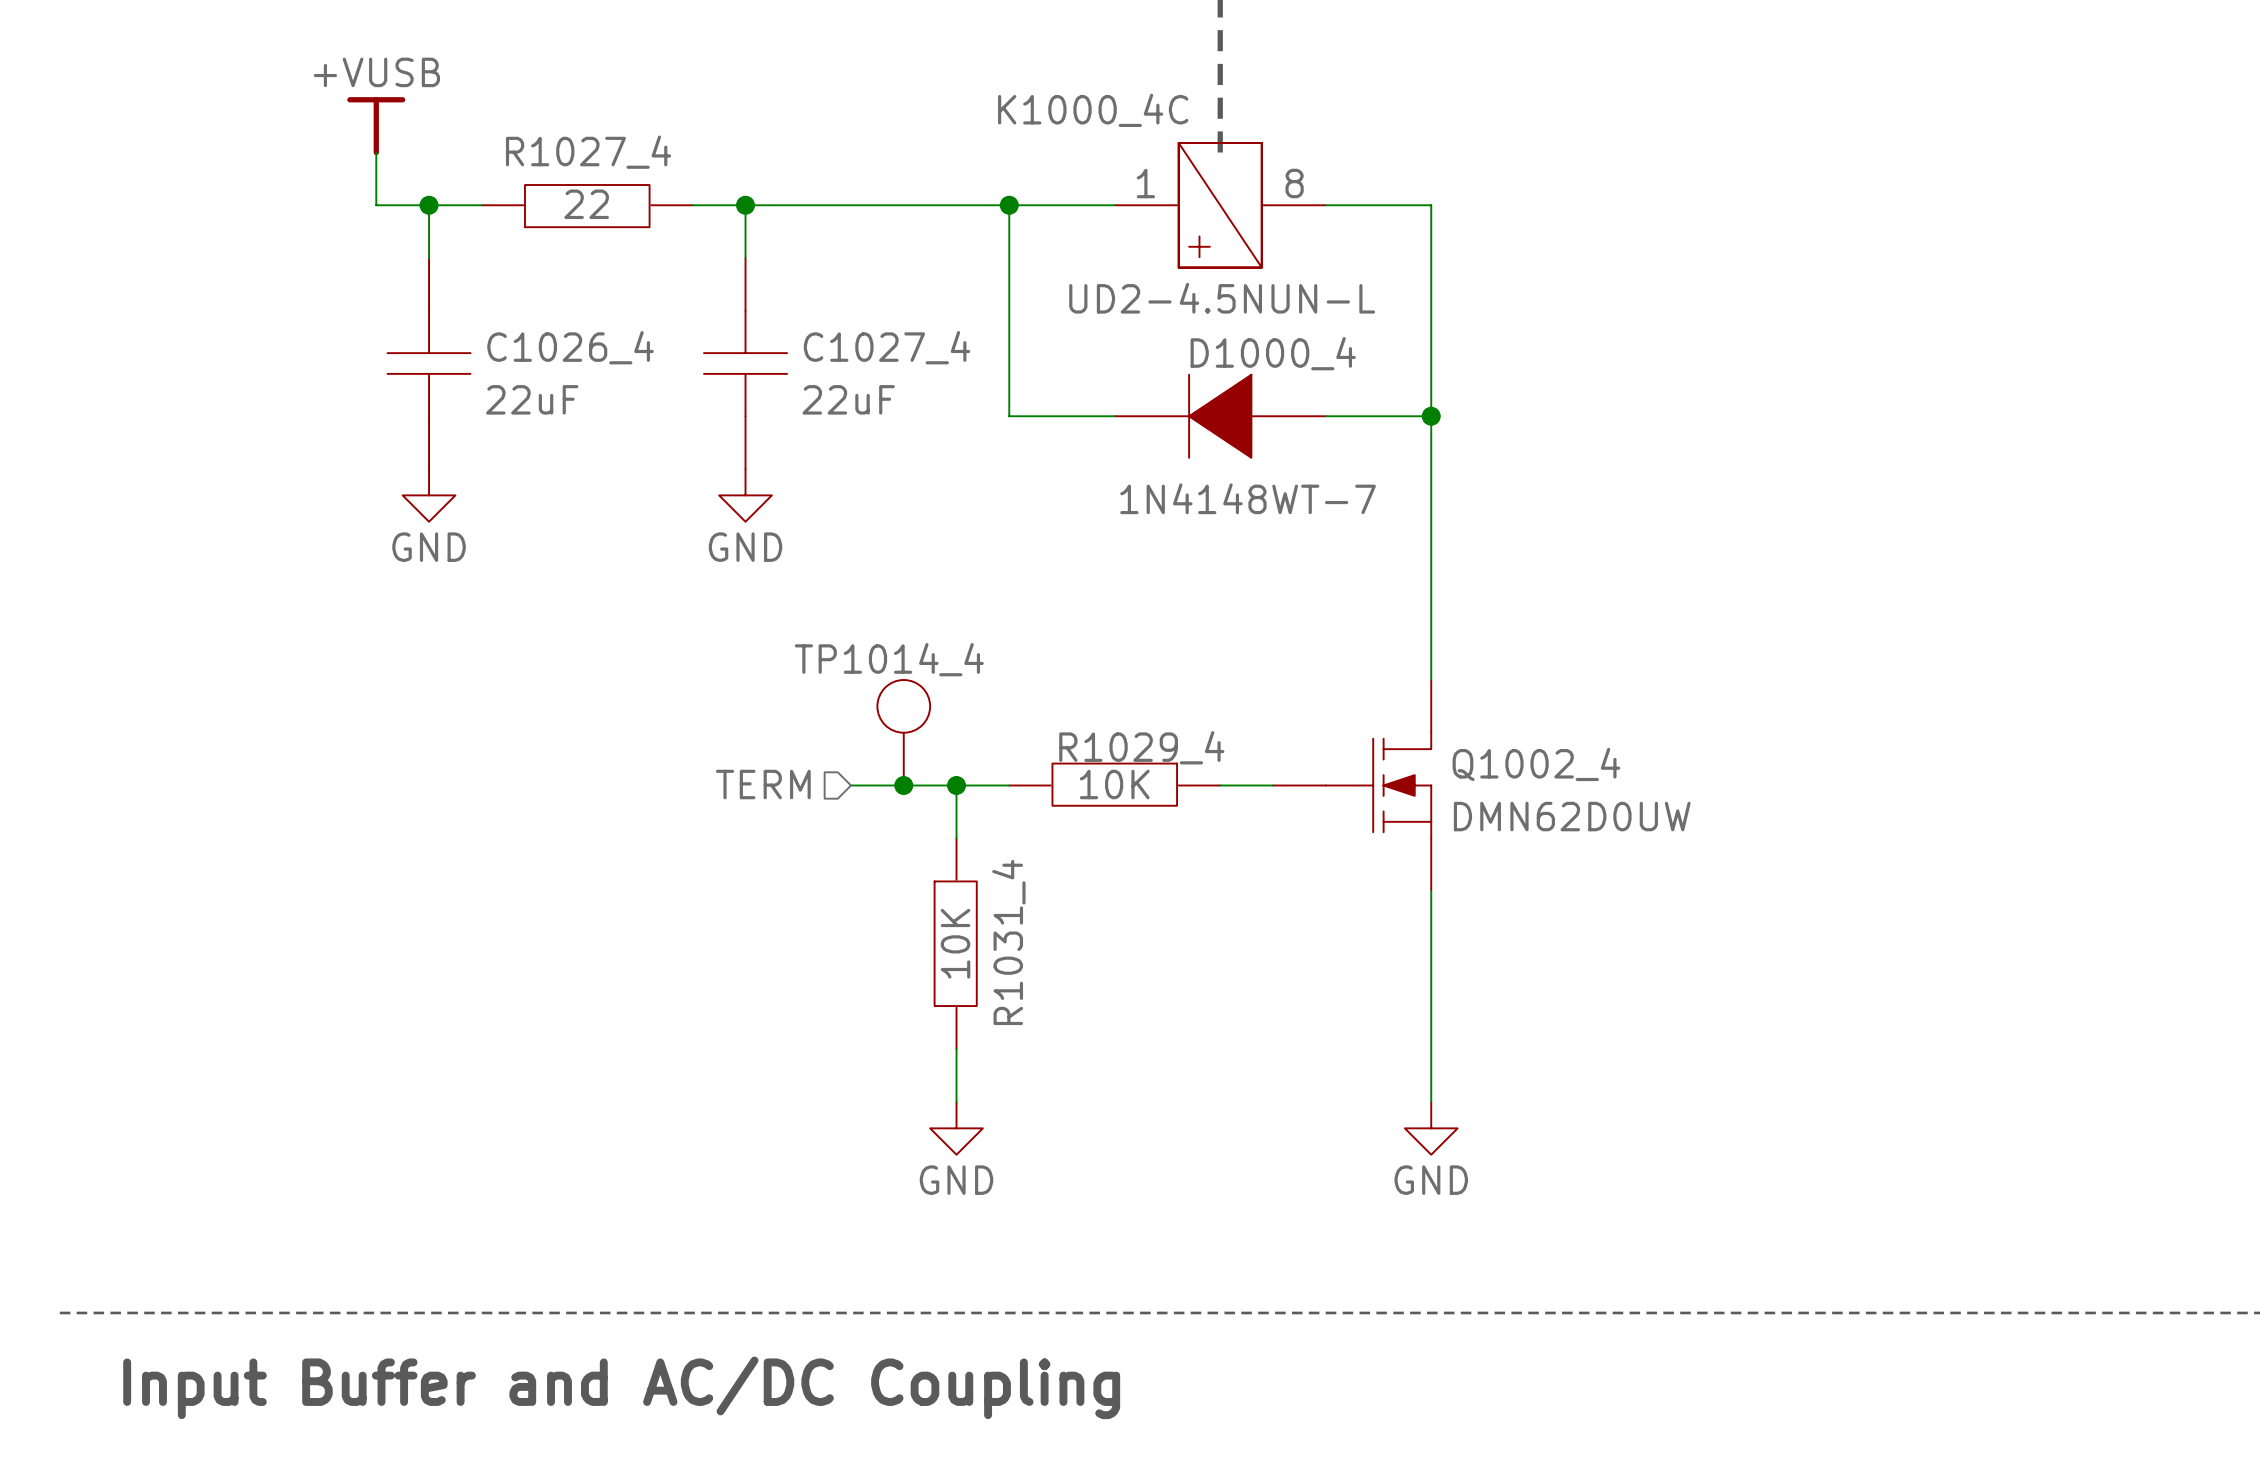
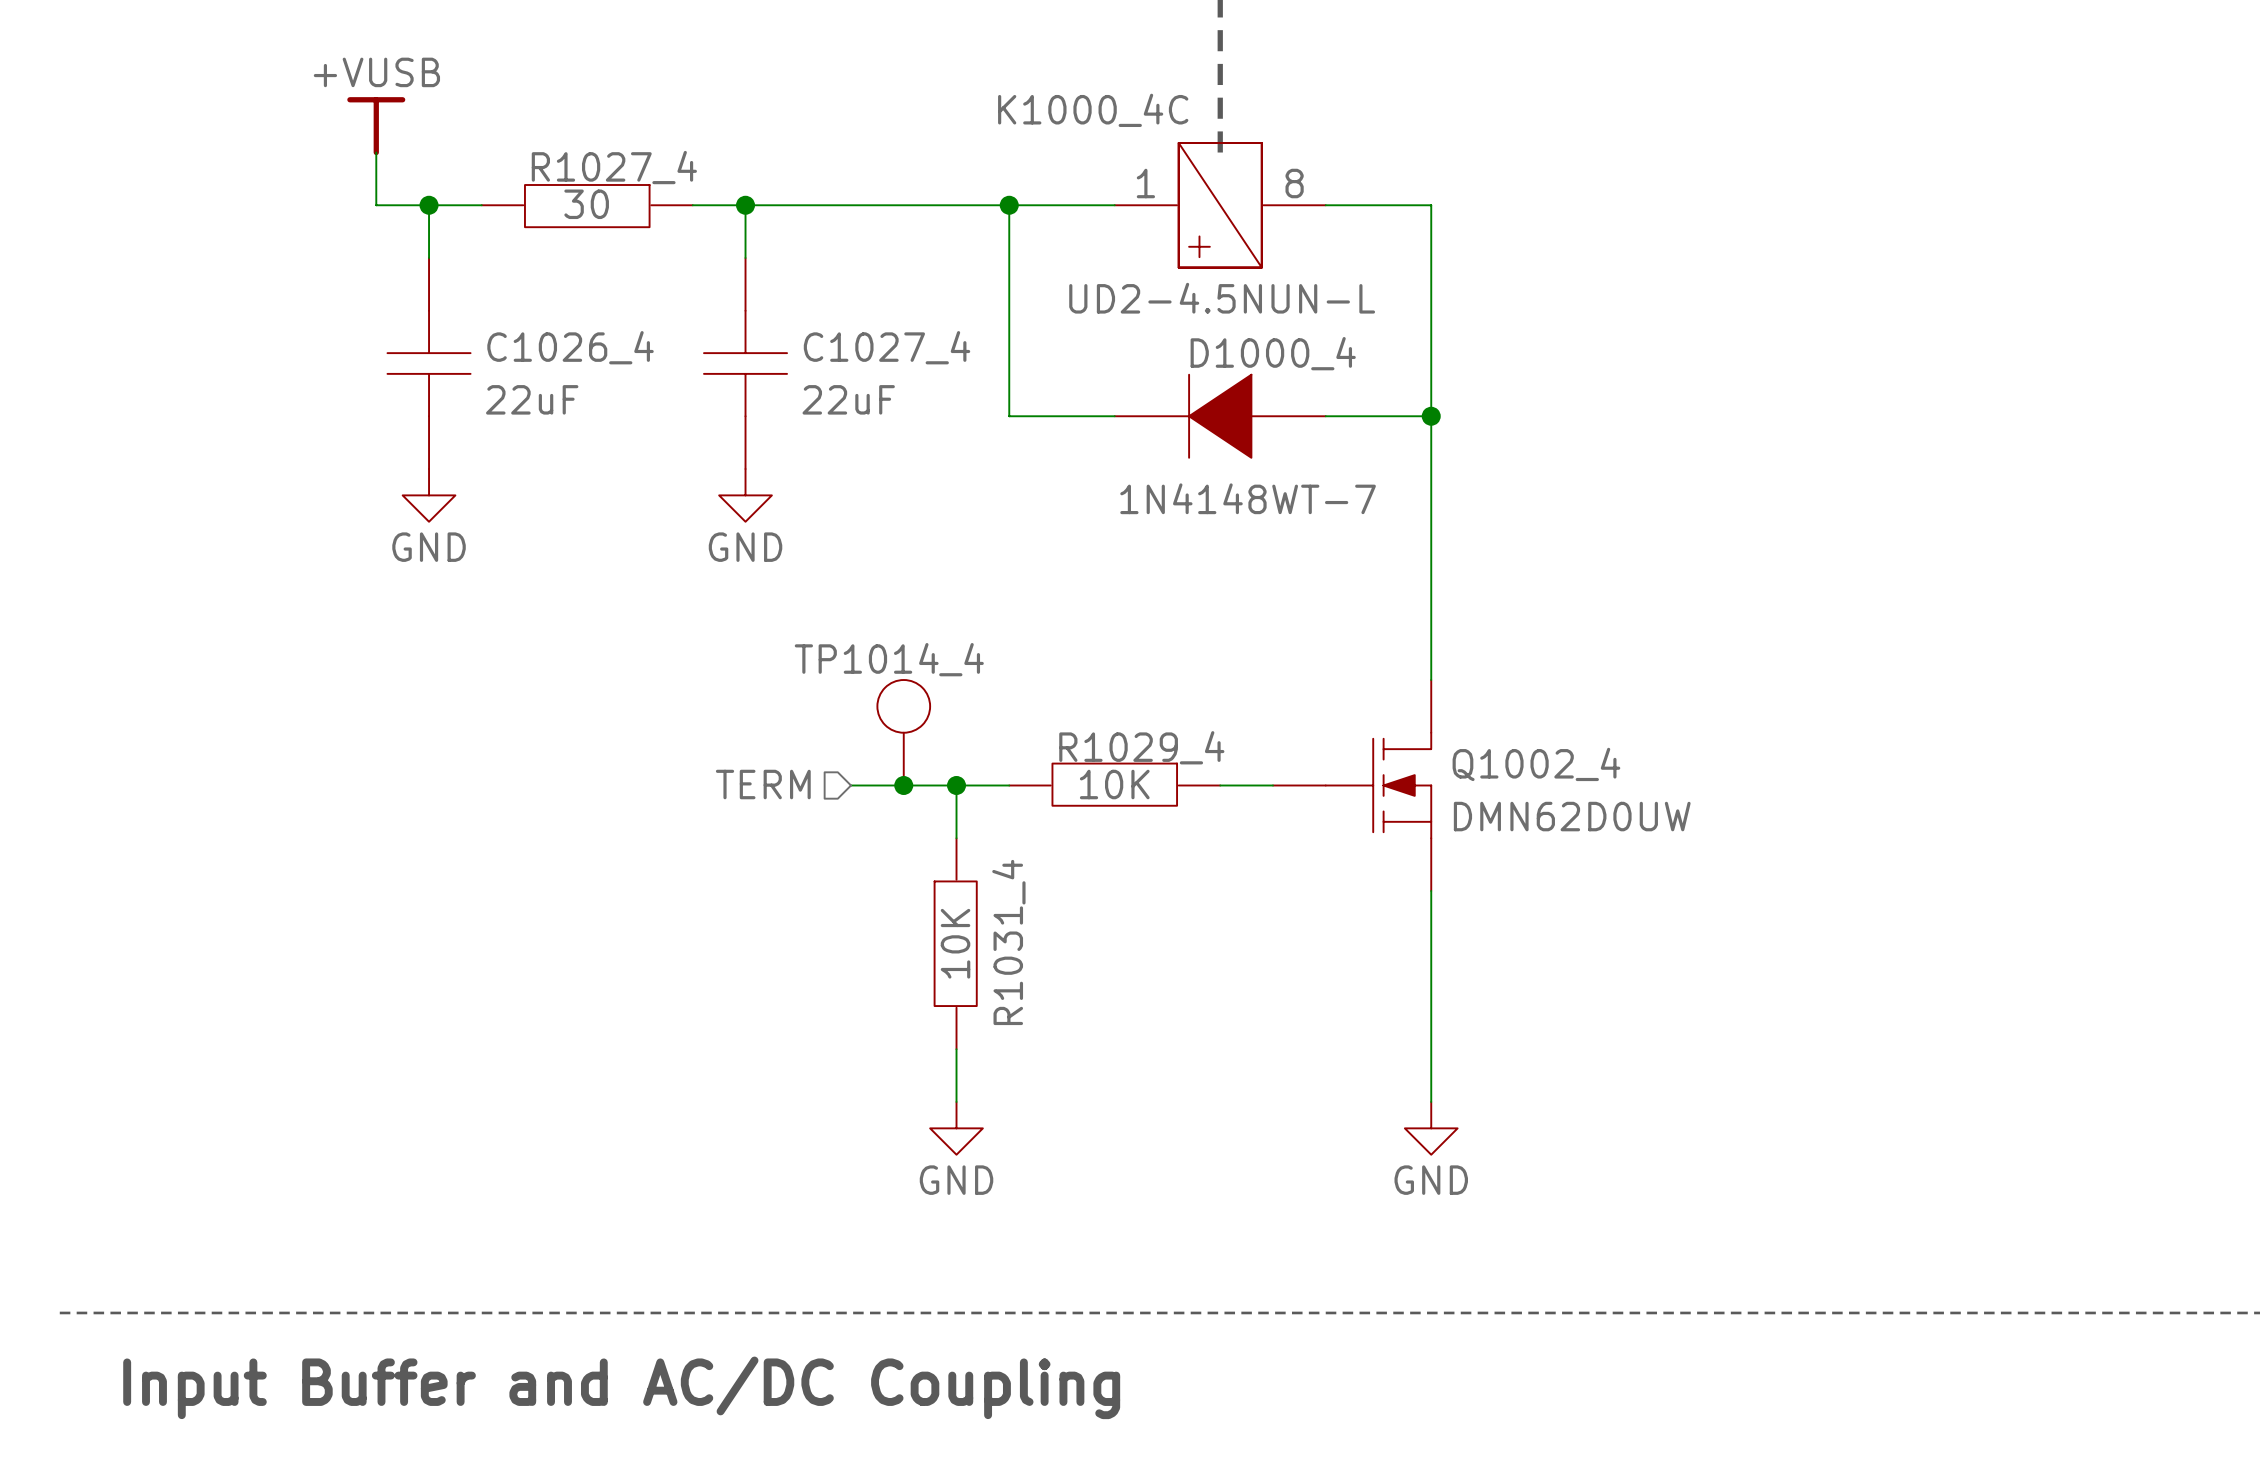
R1027_4 name position: R1027_4 (588, 152) -> R1027_4 (614, 167)
R1027_4 value: 22 (586, 204) -> 30 (586, 204)

